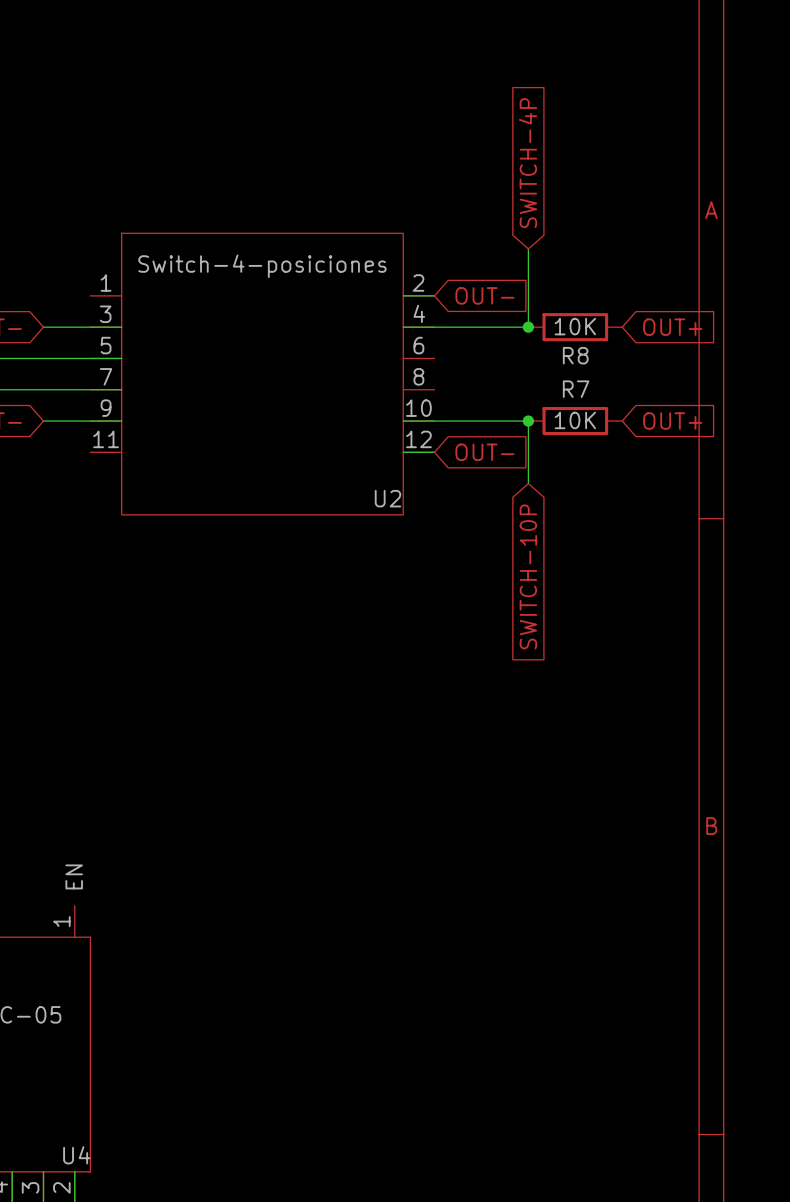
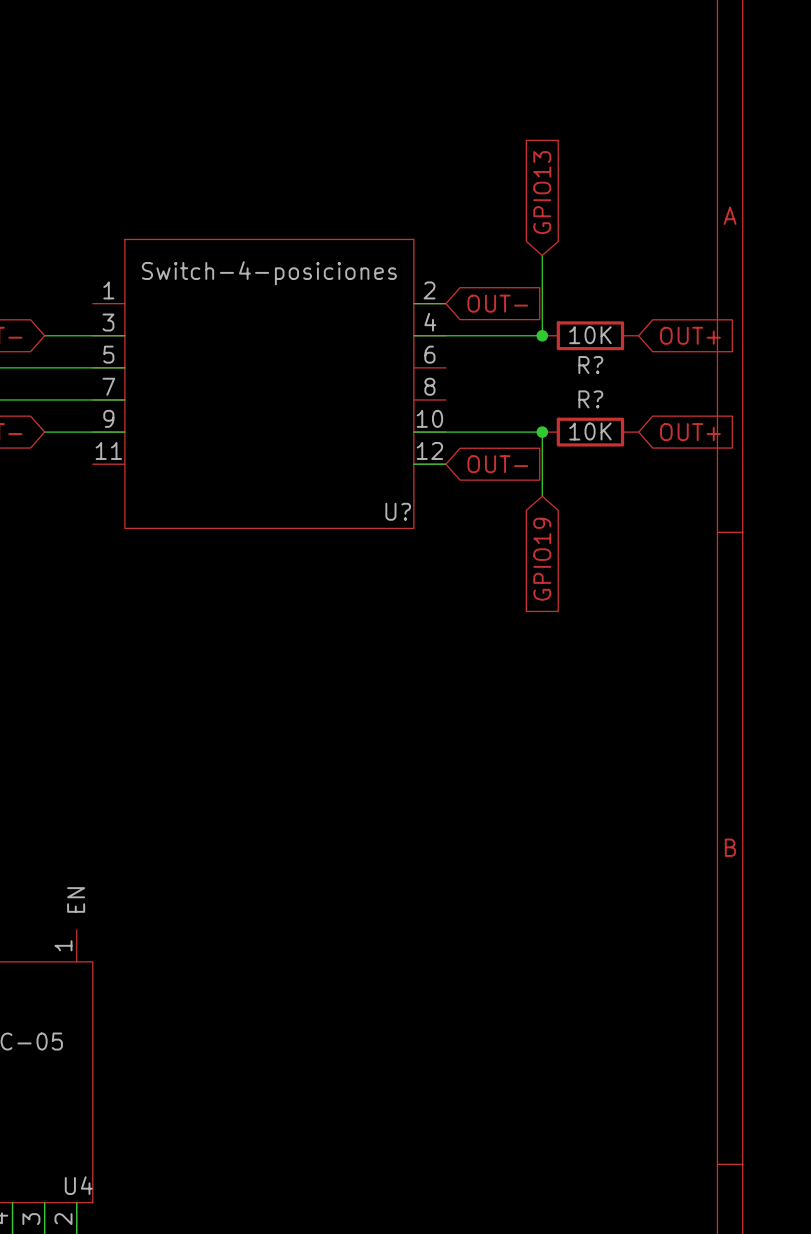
global label: SWITCH-4P (528, 163) -> GPIO13 (542, 192)
R8 name: R8 (575, 355) -> R? (590, 365)
R7 name: R7 (576, 389) -> R? (590, 399)
U2 name: U2 (387, 498) -> U? (398, 511)
global label: SWITCH-10P (528, 576) -> GPIO19 (542, 559)

